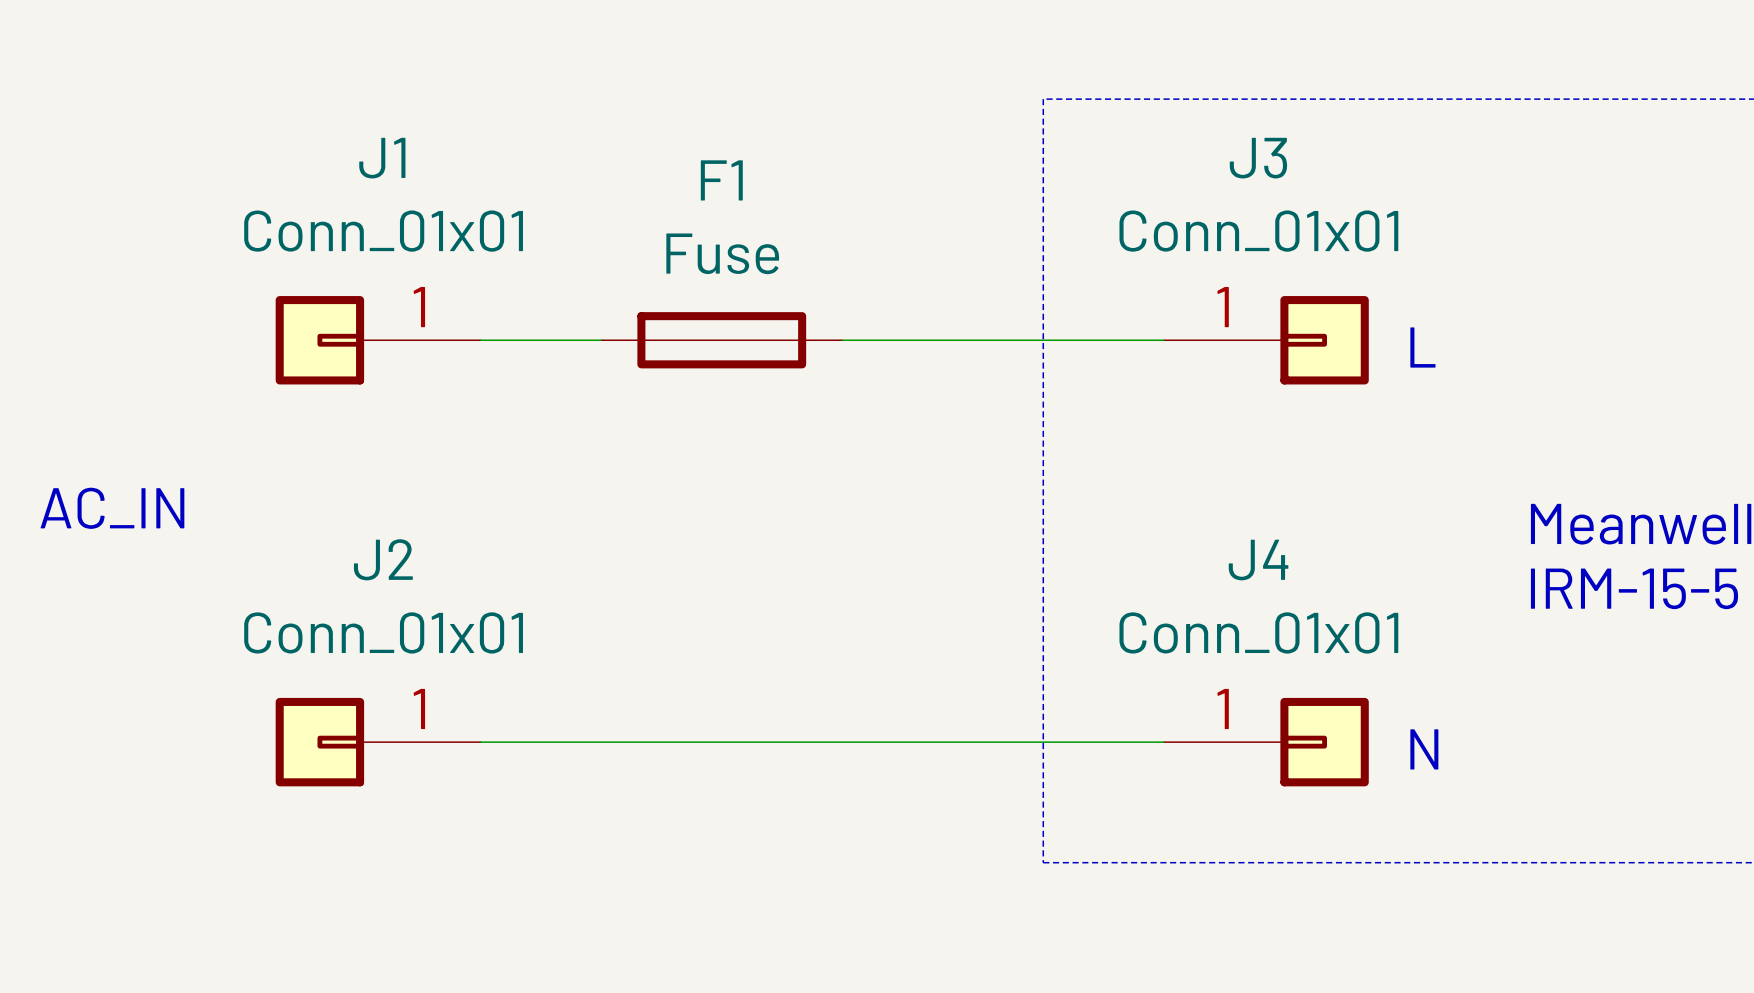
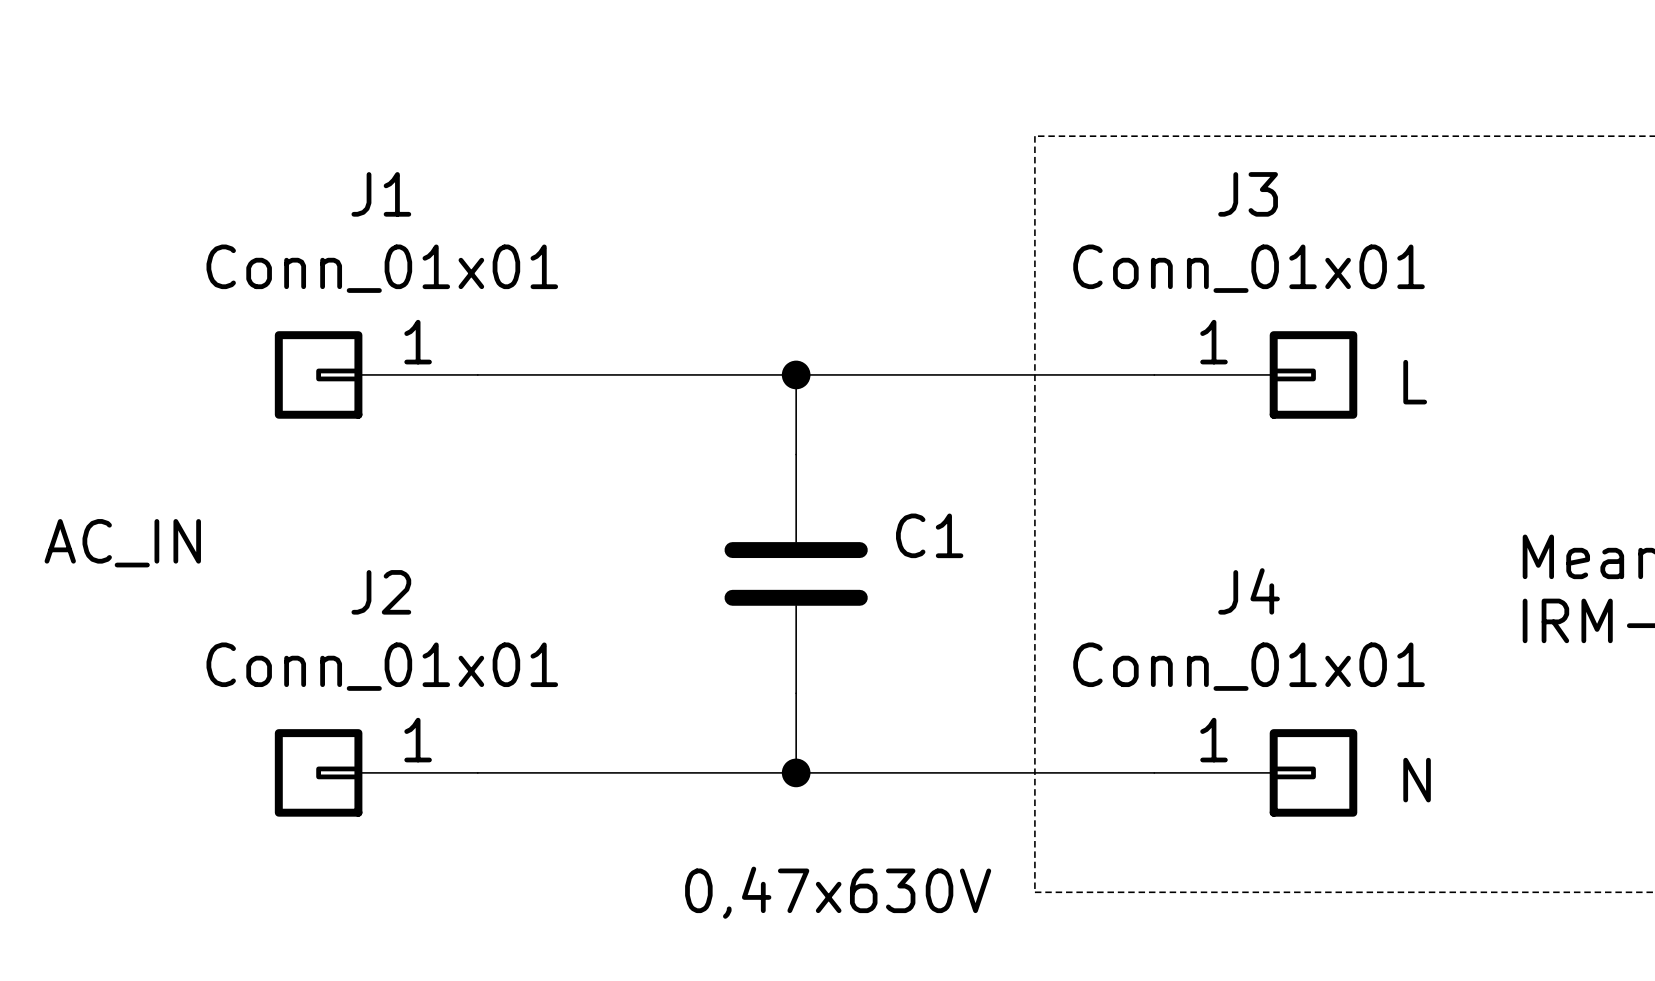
F1: Fuse (721, 340) -> none
wire: none -> (796, 374) (796, 454)
junction: none -> (796, 374)
C1: none -> 0,47x630V (796, 573)
wire: none -> (796, 693) (796, 772)
junction: none -> (796, 772)

